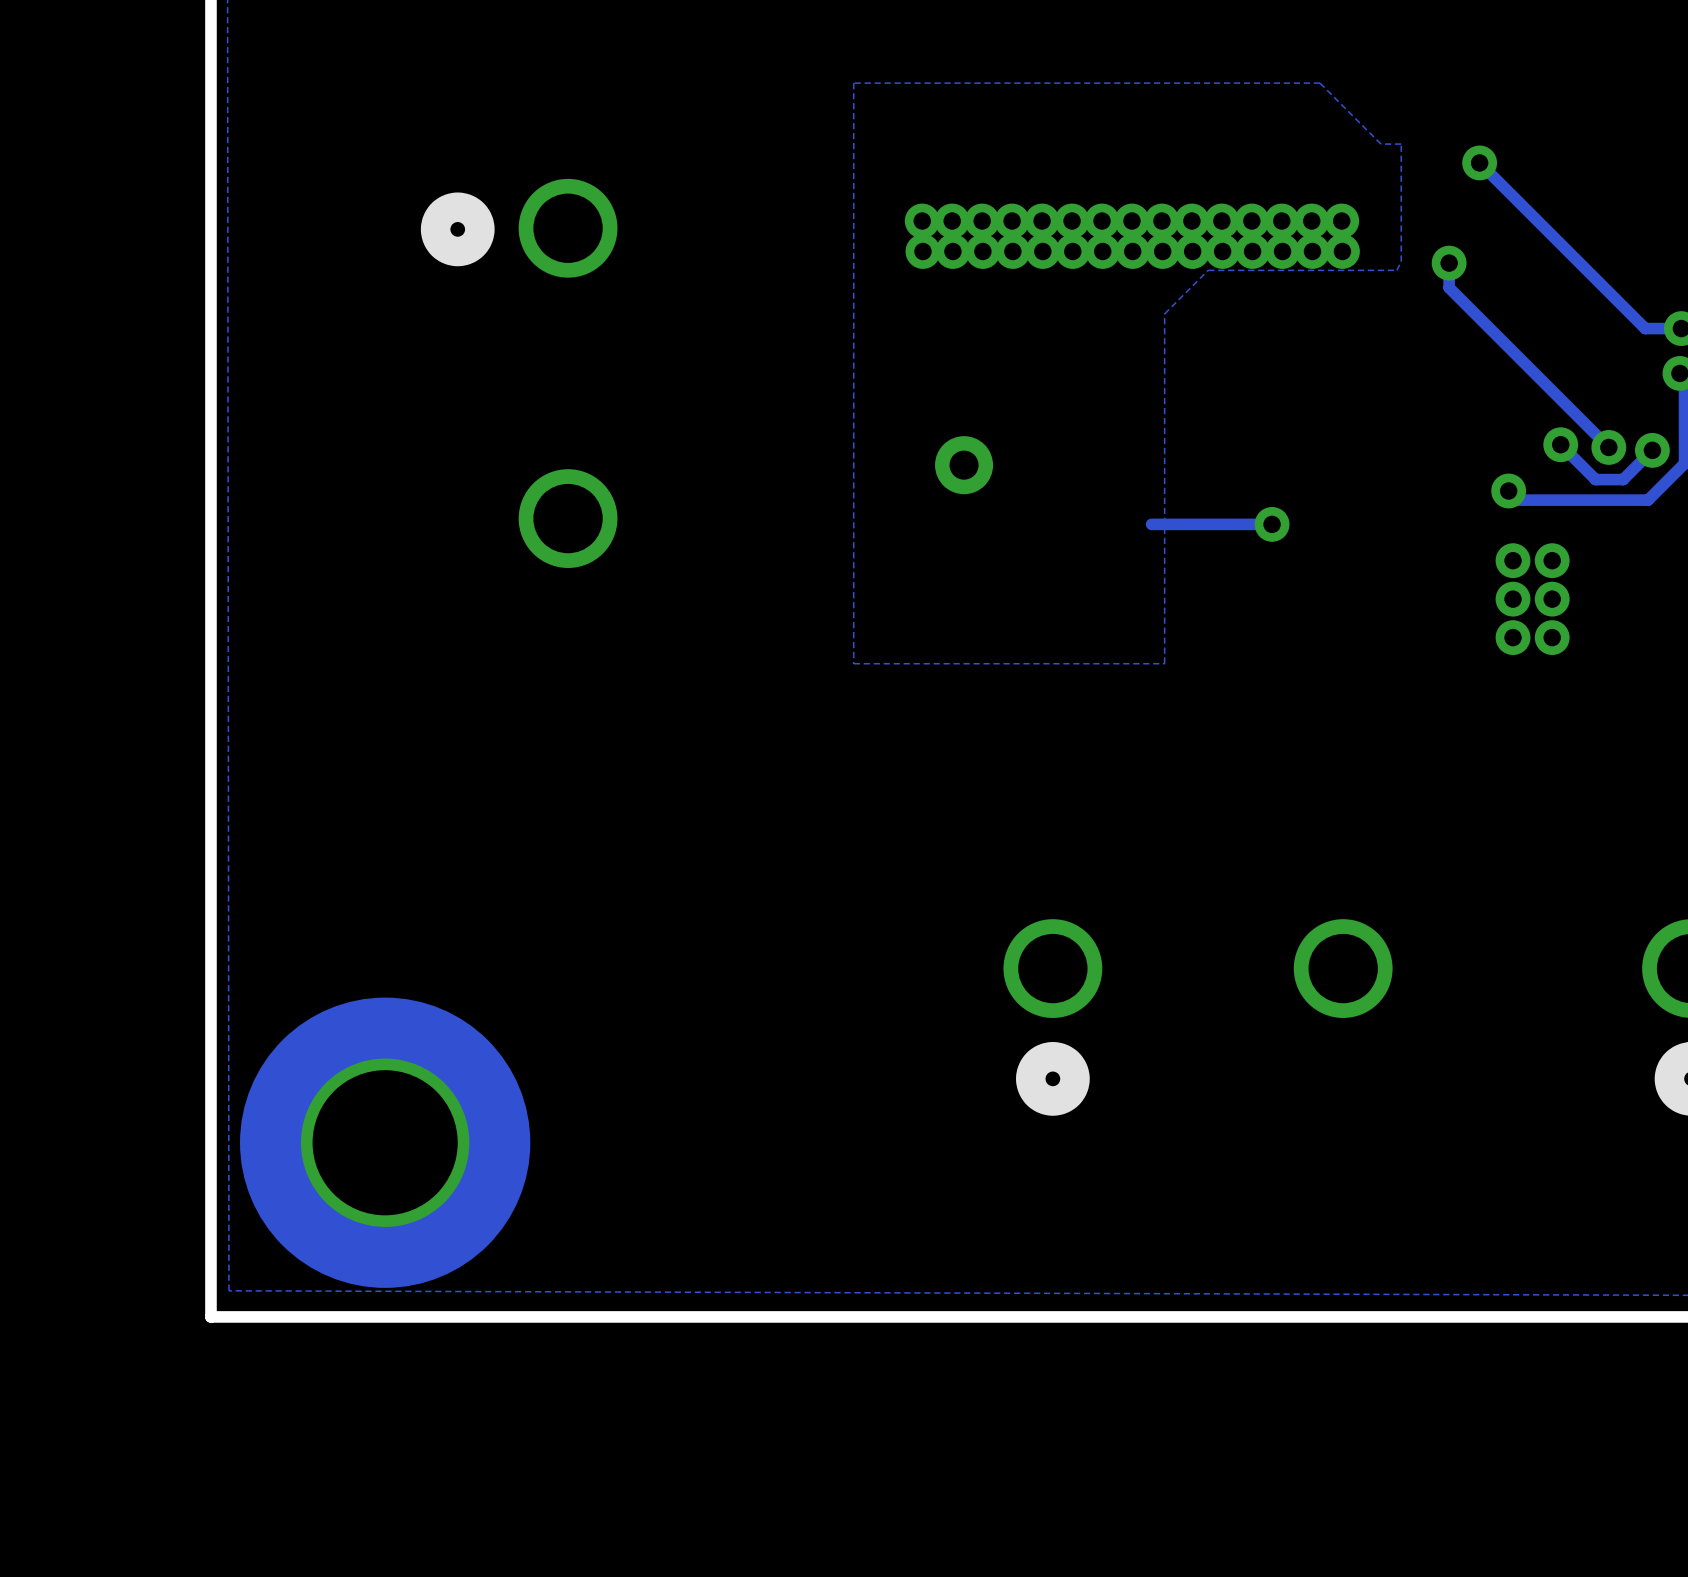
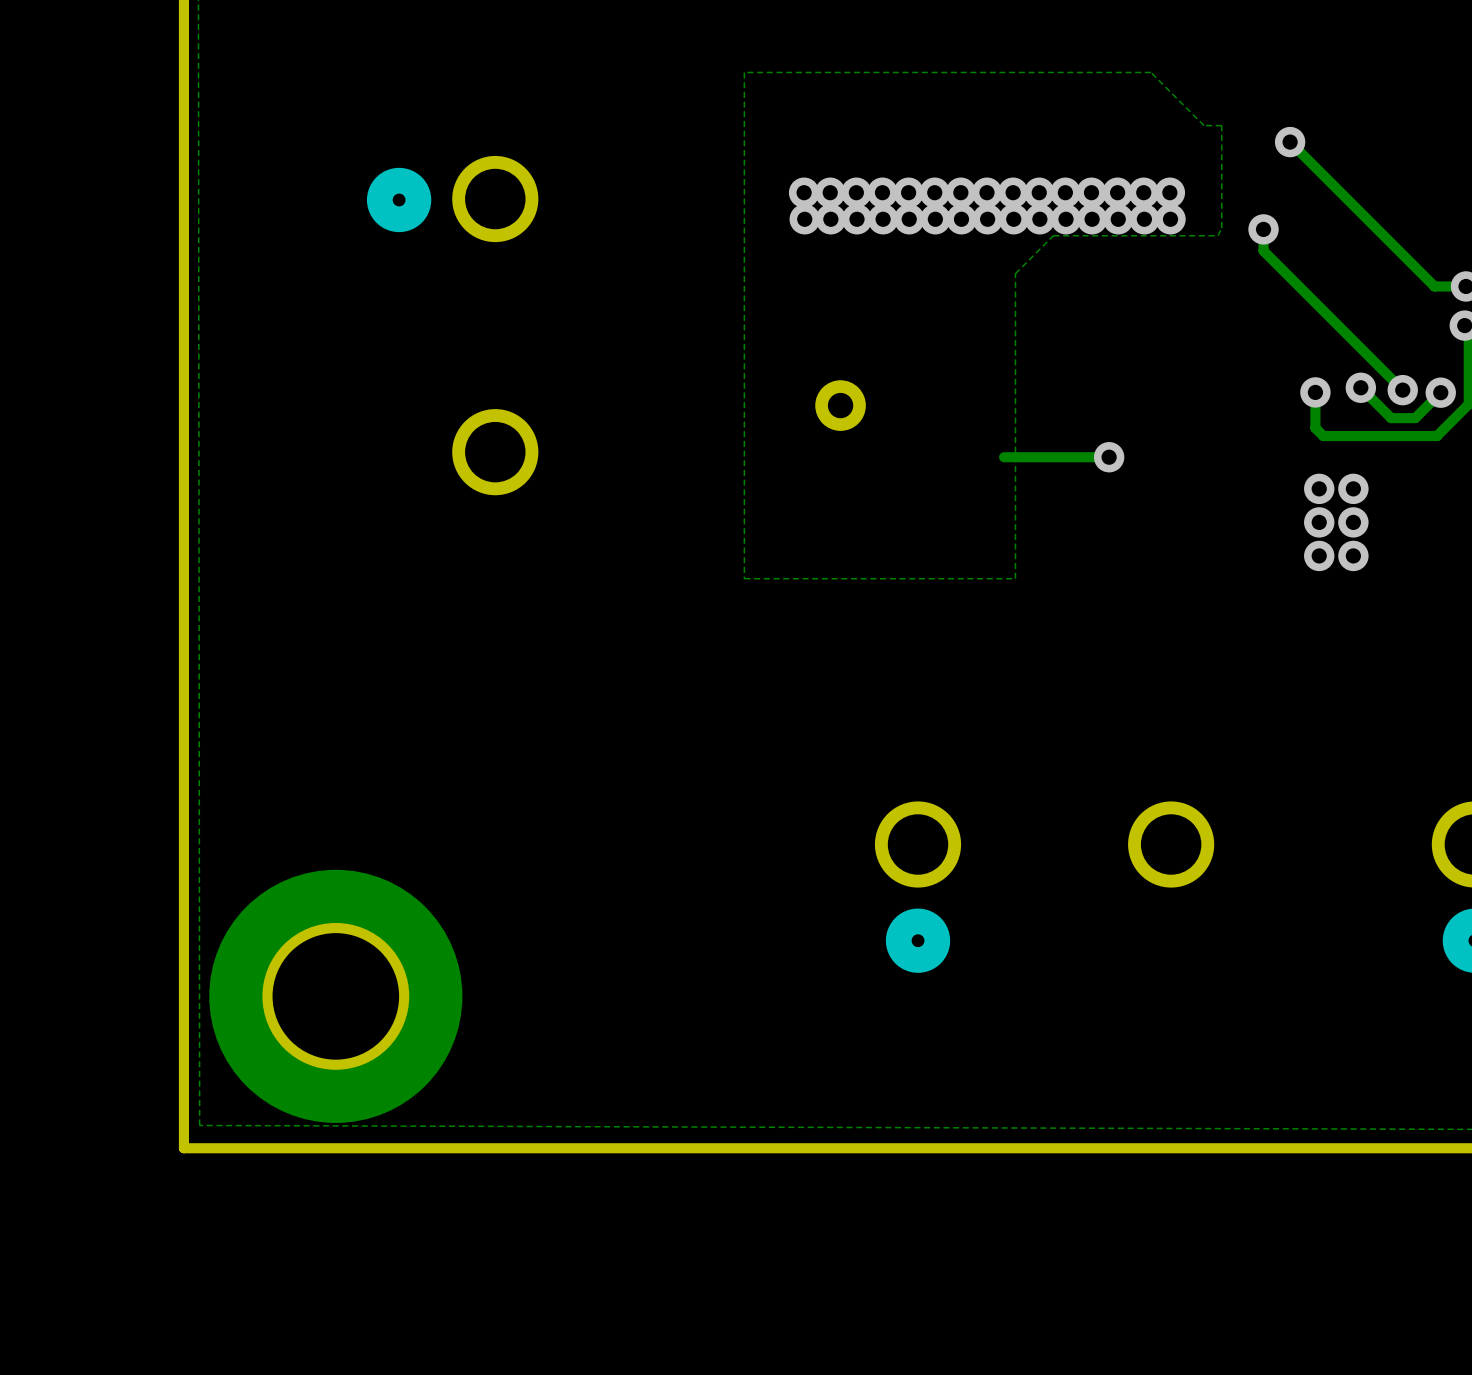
track: none -> (1315, 392) (1315, 428)
via position: (1508, 491) -> (1315, 392)

